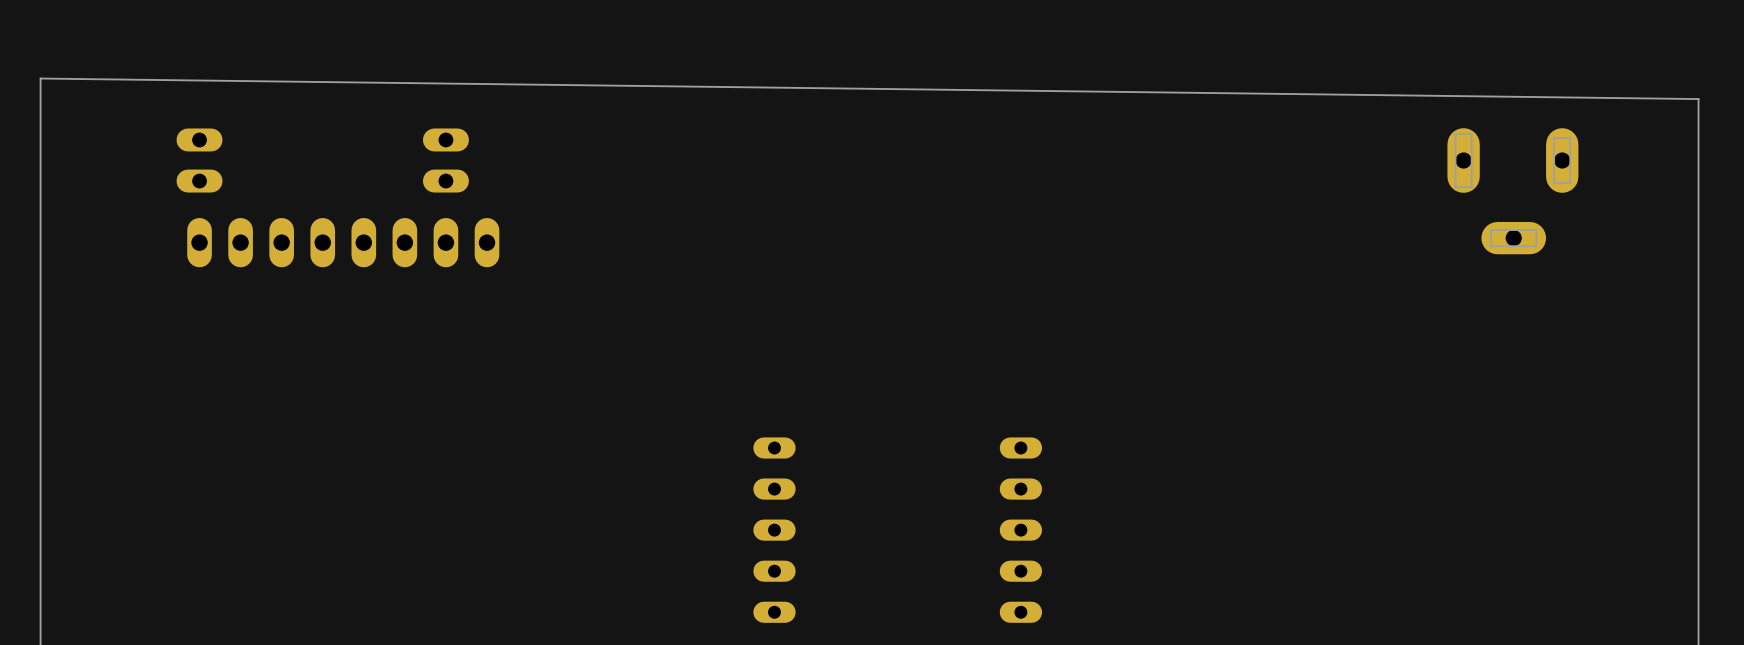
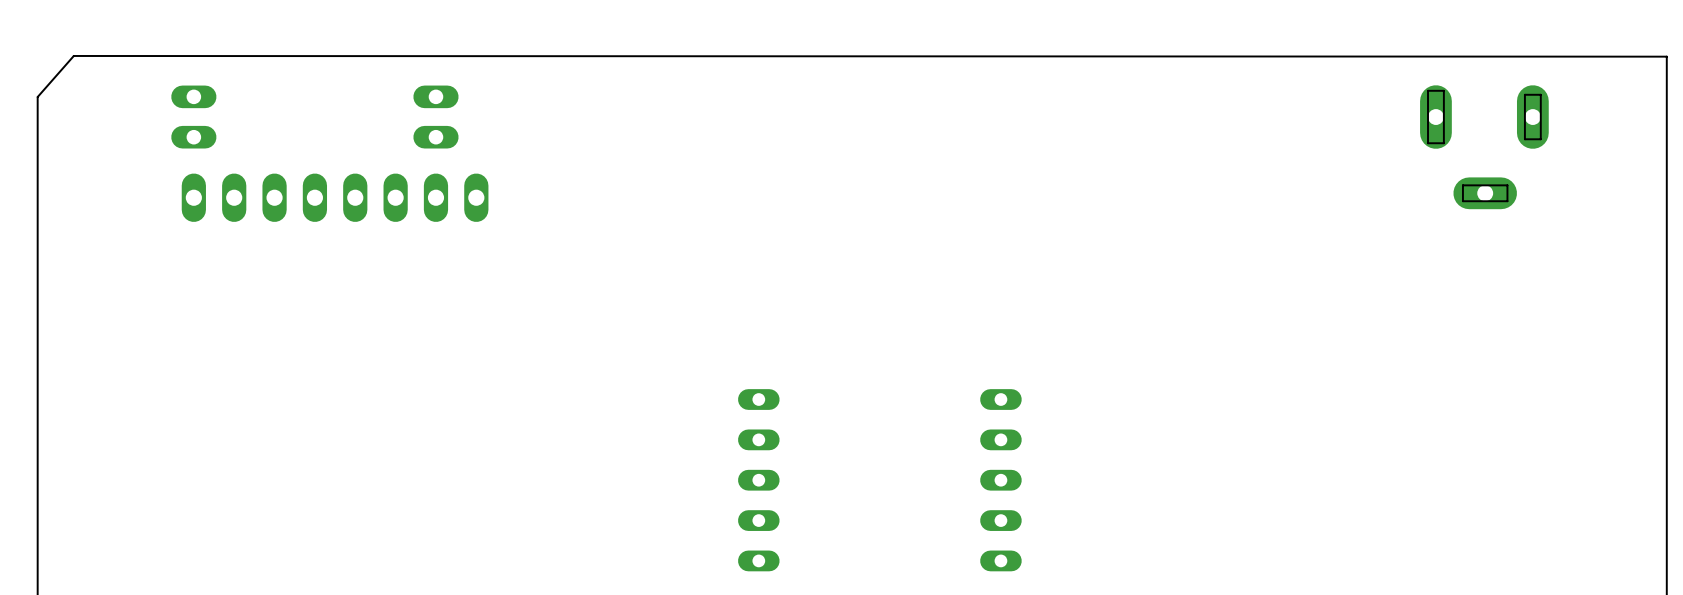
board edge: (1698, 99) (40, 78) (40, 140) -> (1666, 56) (73, 55) (37, 97)

